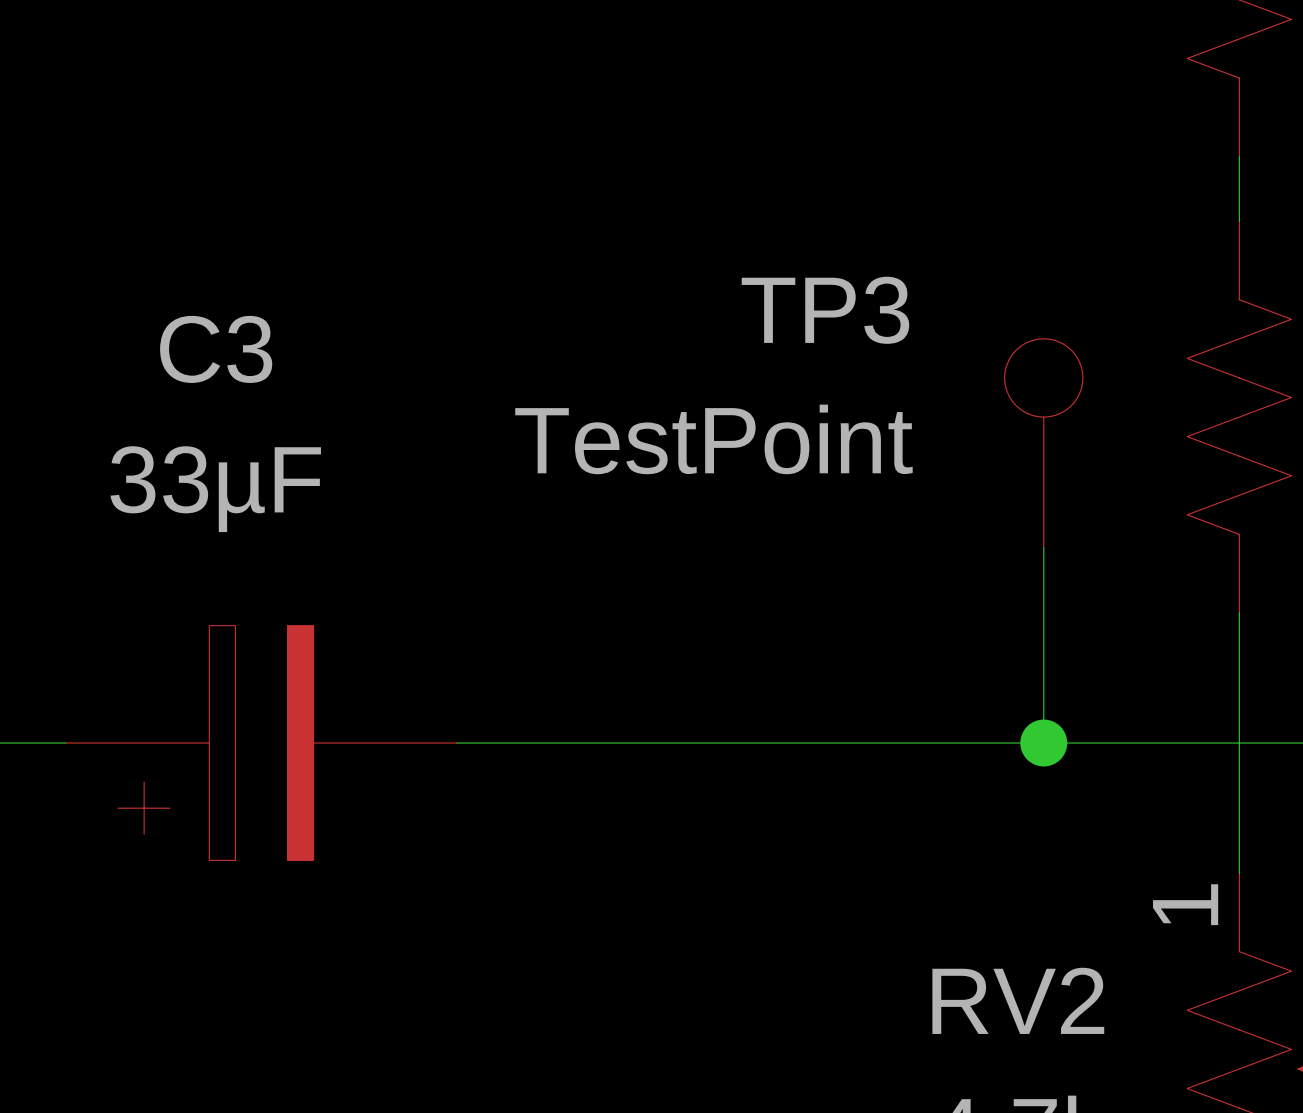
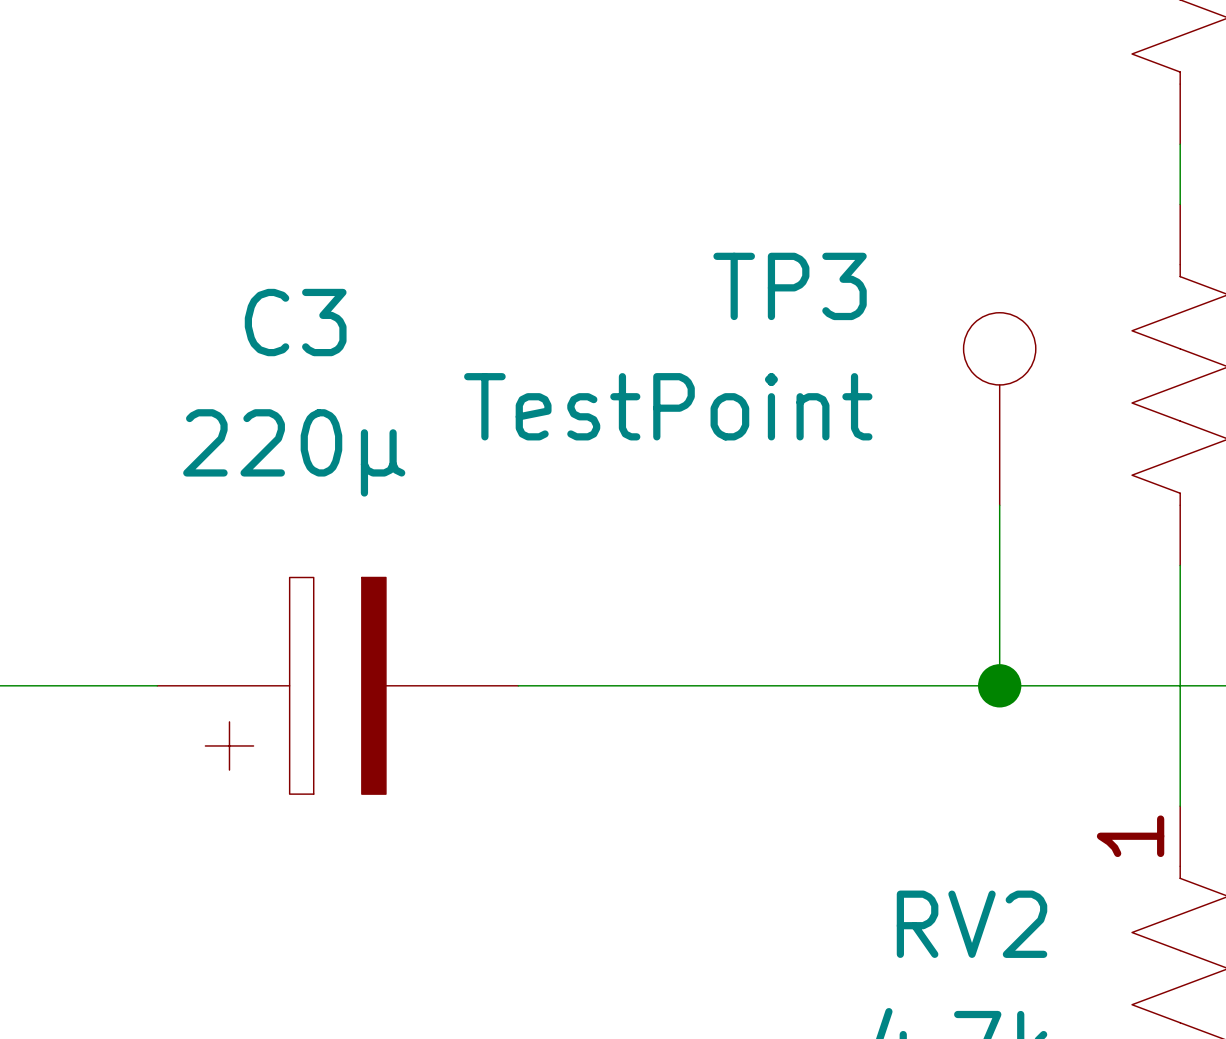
C3 value: 33µF (215, 489) -> 220µ (294, 452)
C3 position: (261, 743) -> (337, 685)

